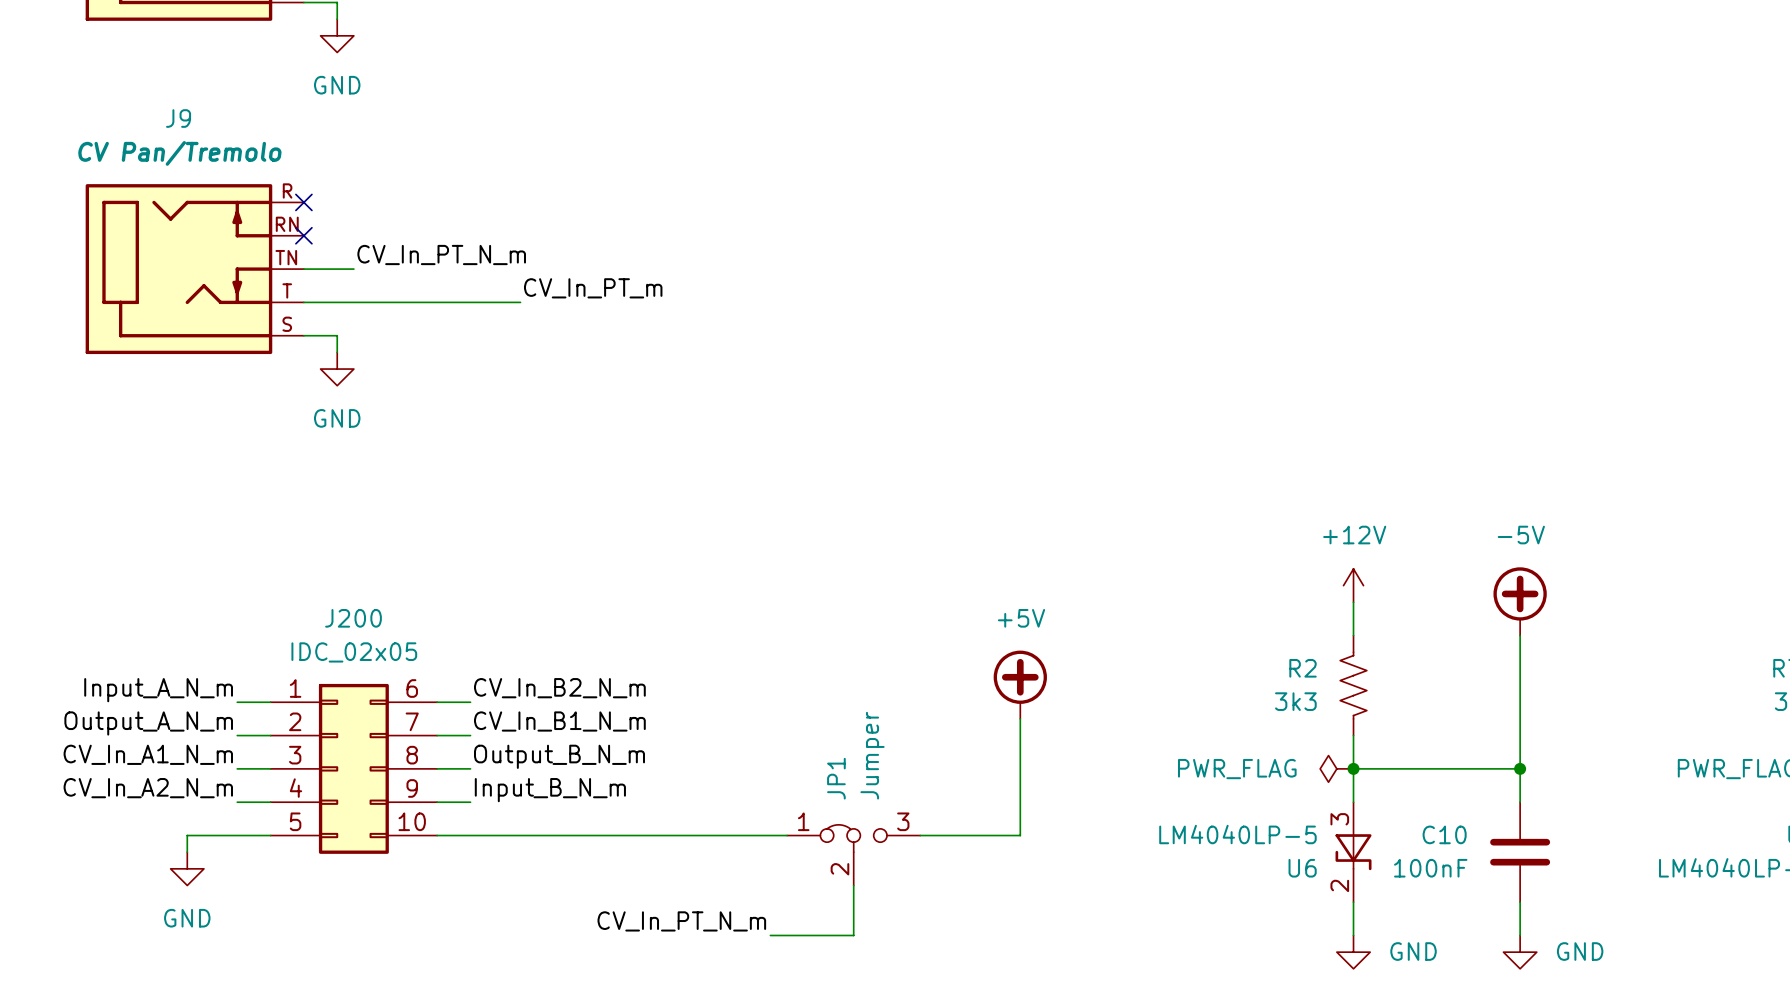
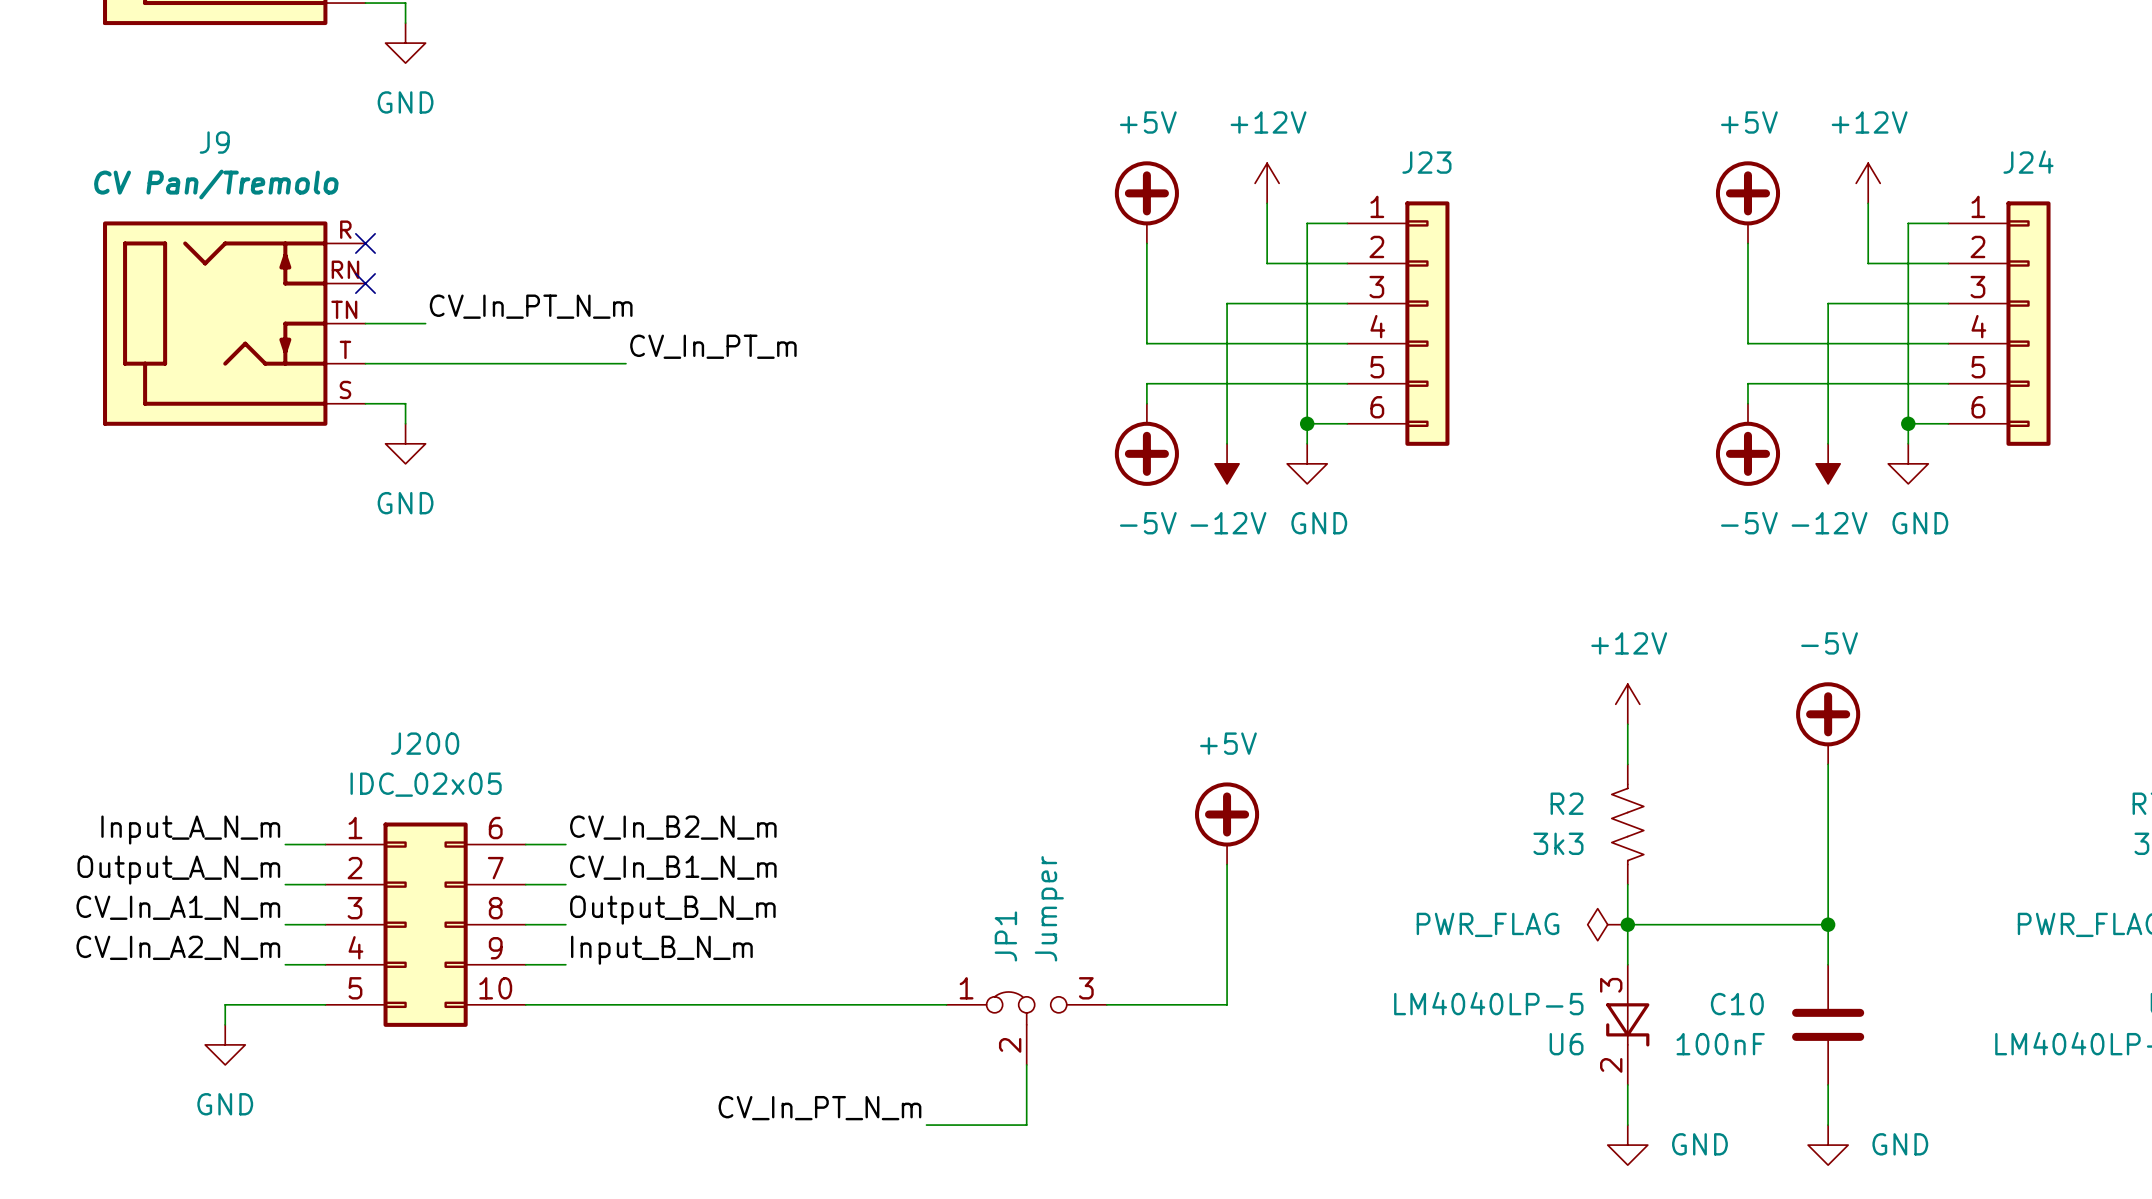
power symbol: none -> +12V (1267, 183)
power symbol: none -> +12V (1868, 183)
power symbol: none -> +5V (1146, 202)
power symbol: none -> +5V (1747, 202)
wire: none -> (1267, 203) (1267, 263) (1347, 263)
wire: none -> (1868, 203) (1868, 263) (1948, 263)
wire: none -> (1347, 223) (1307, 223) (1307, 443)
wire: none -> (1948, 223) (1908, 223) (1908, 443)
wire: none -> (1146, 243) (1146, 343) (1347, 343)
wire: none -> (1747, 243) (1747, 343) (1948, 343)
wire: none -> (1347, 303) (1227, 303) (1227, 443)
wire: none -> (1948, 303) (1828, 303) (1828, 443)
J23: none -> (1398, 323)
J24: none -> (1999, 323)
wire: none -> (1347, 383) (1146, 383) (1146, 403)
wire: none -> (1948, 383) (1747, 383) (1747, 403)
wire: none -> (1307, 423) (1347, 423)
junction: none -> (1307, 423)
wire: none -> (1908, 423) (1948, 423)
junction: none -> (1908, 423)
power symbol: none -> -5V (1146, 444)
power symbol: none -> -5V (1747, 444)
power symbol: none -> -12V (1227, 463)
power symbol: none -> GND (1307, 463)
power symbol: none -> -12V (1828, 463)
power symbol: none -> GND (1908, 463)

